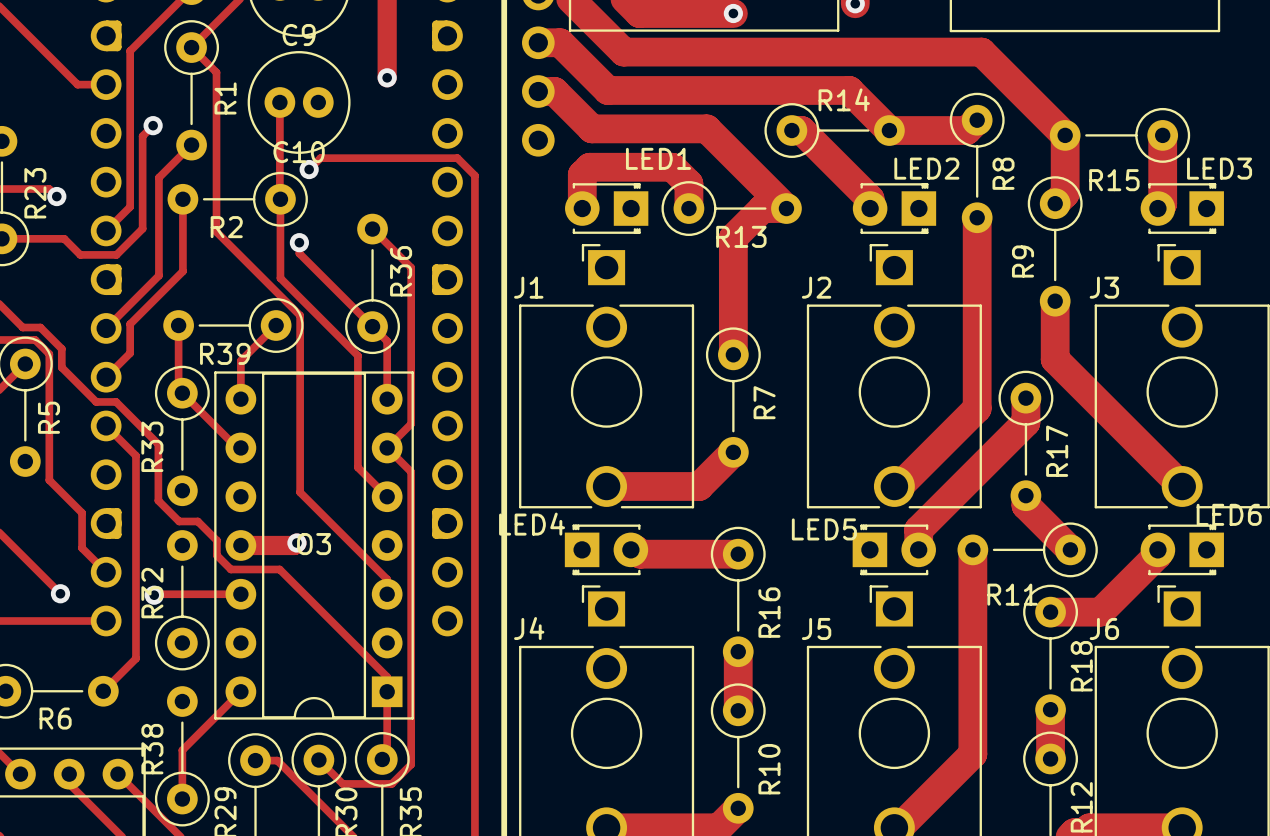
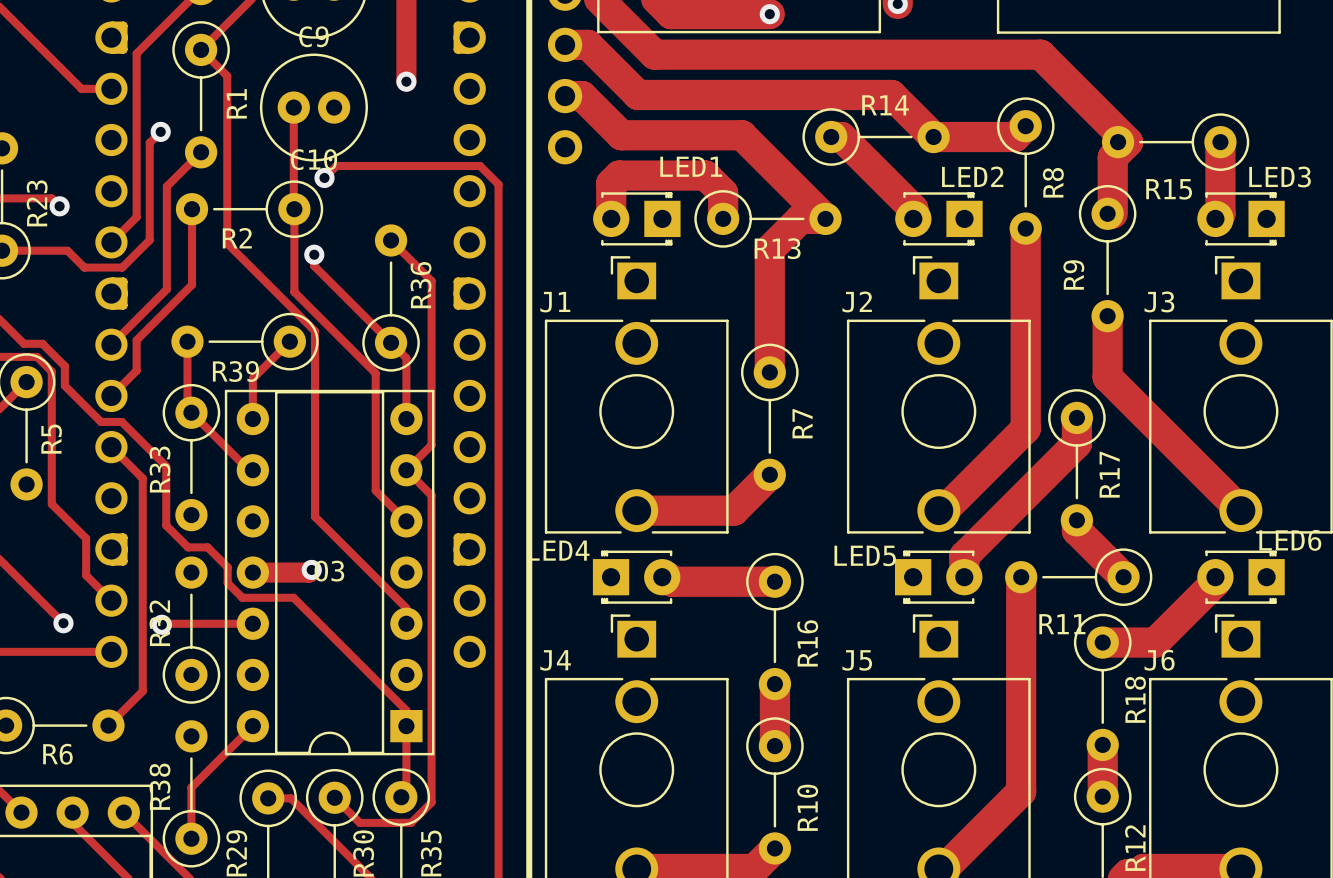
track: (981, 52) (1064, 135) -> (1030, 54) (1040, 54) (1128, 142) (1112, 157) (1112, 213)
track: (1065, 135) (1065, 193) (1055, 203) -> none

